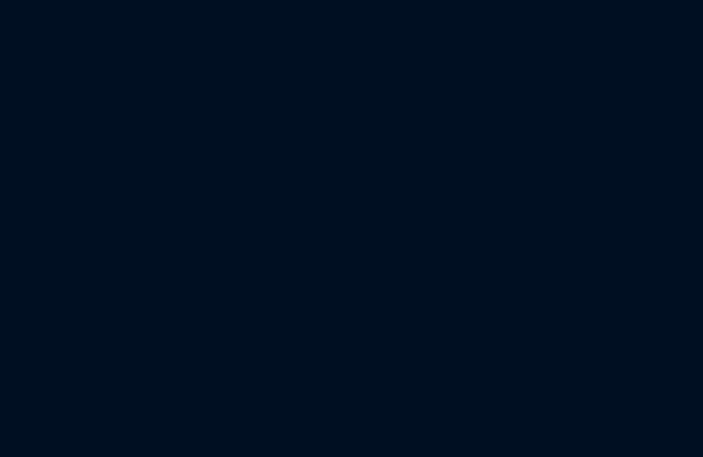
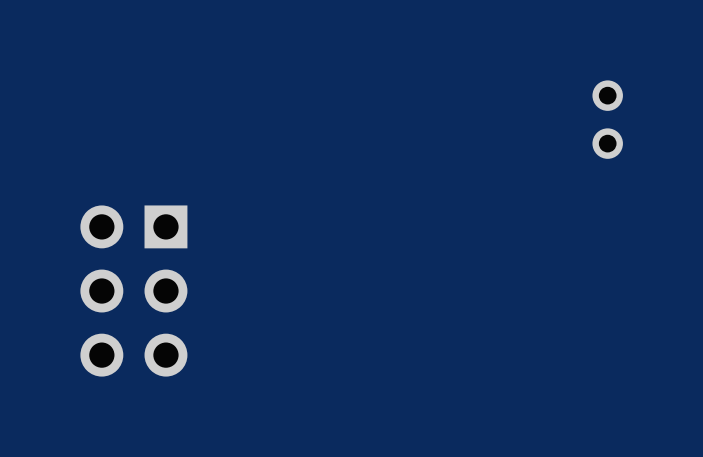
part: none -> (607, 119)
part: none -> (133, 291)

